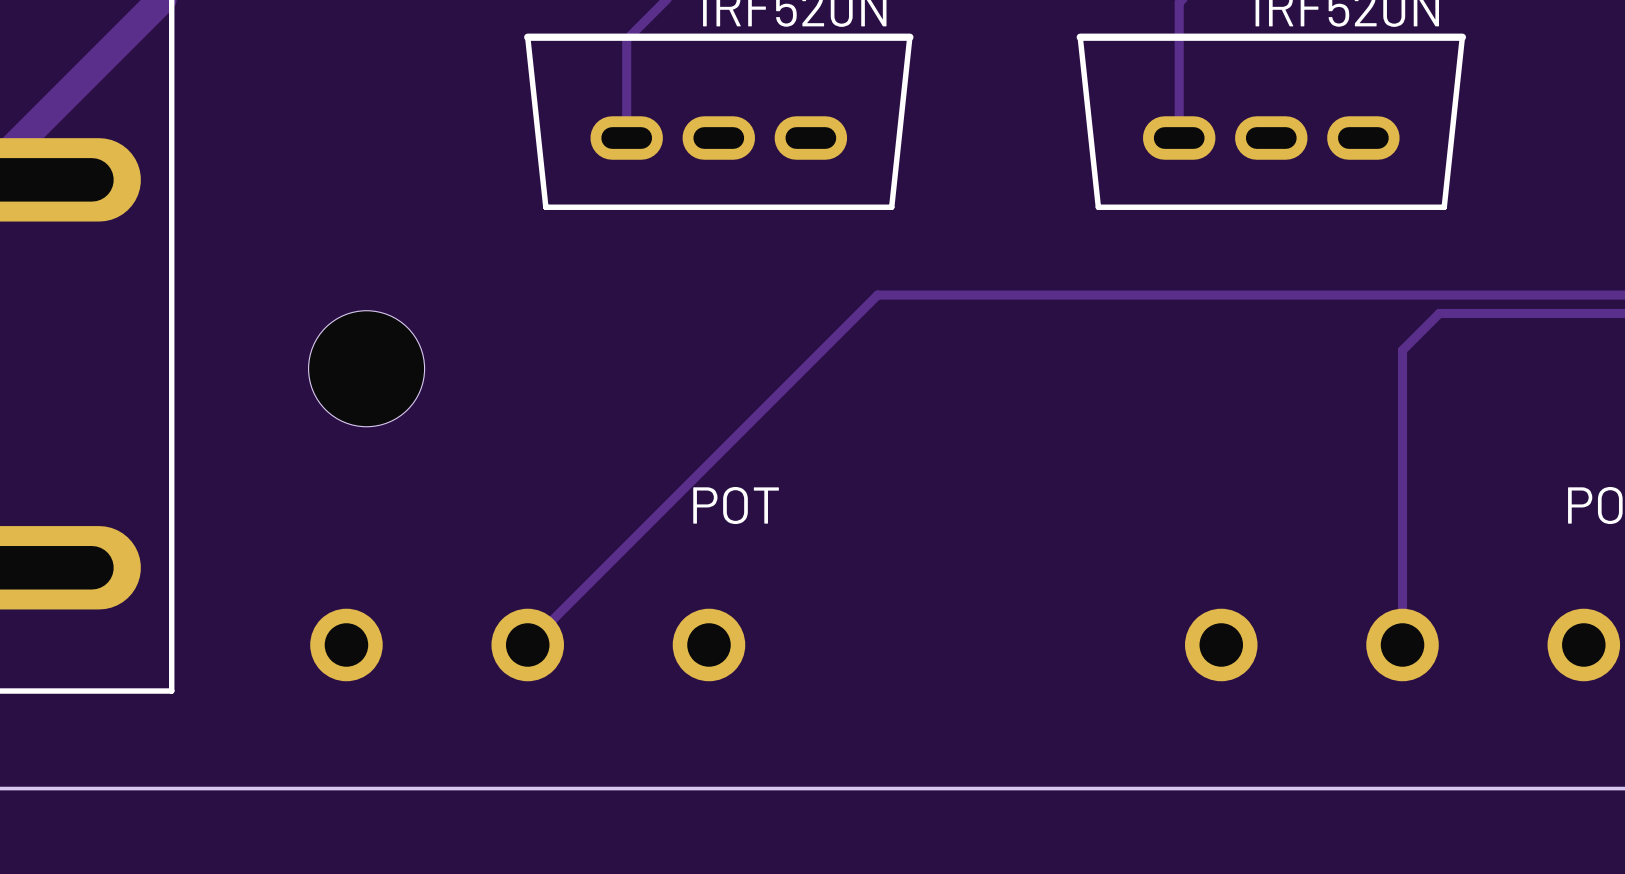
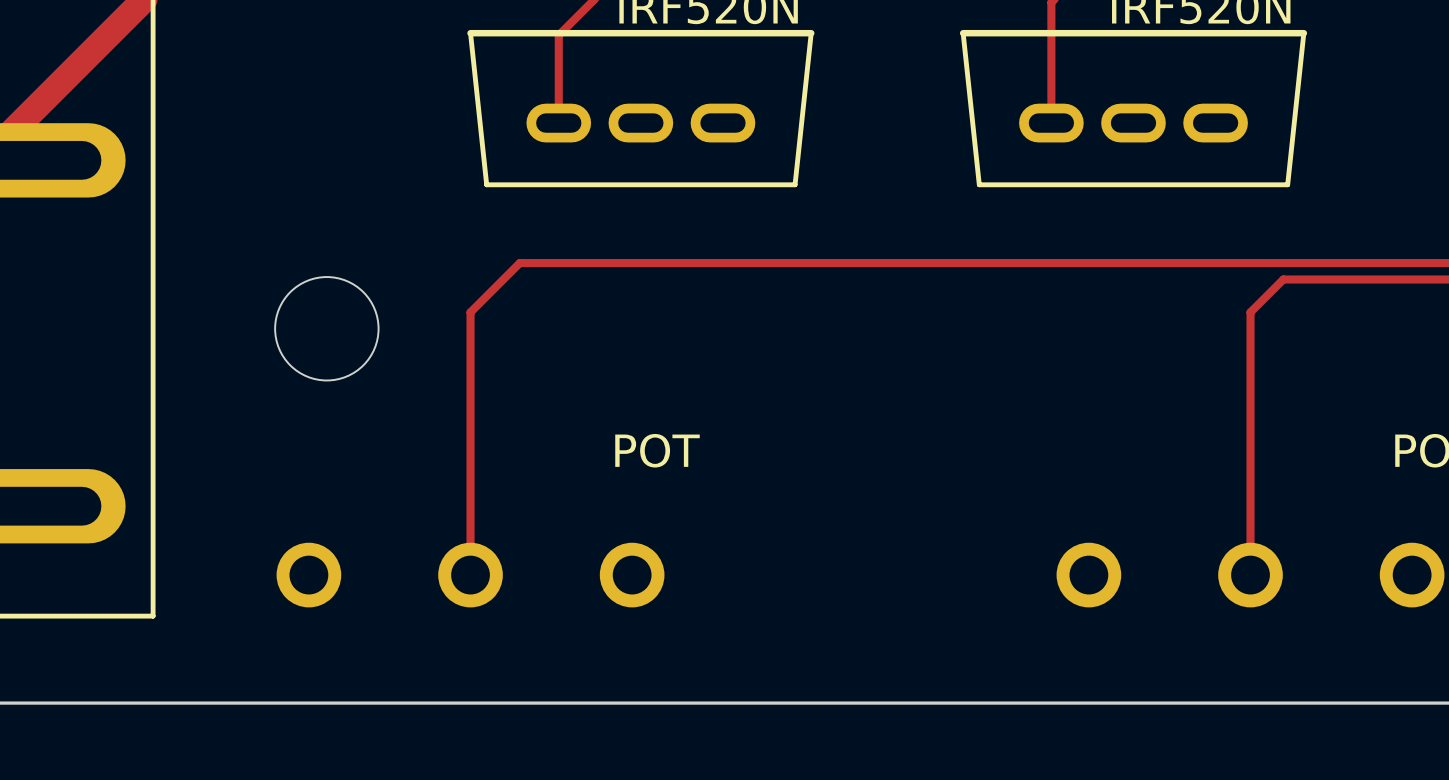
track: (877, 295) (527, 644) -> (782, 263) (519, 263) (470, 312) (470, 575)

